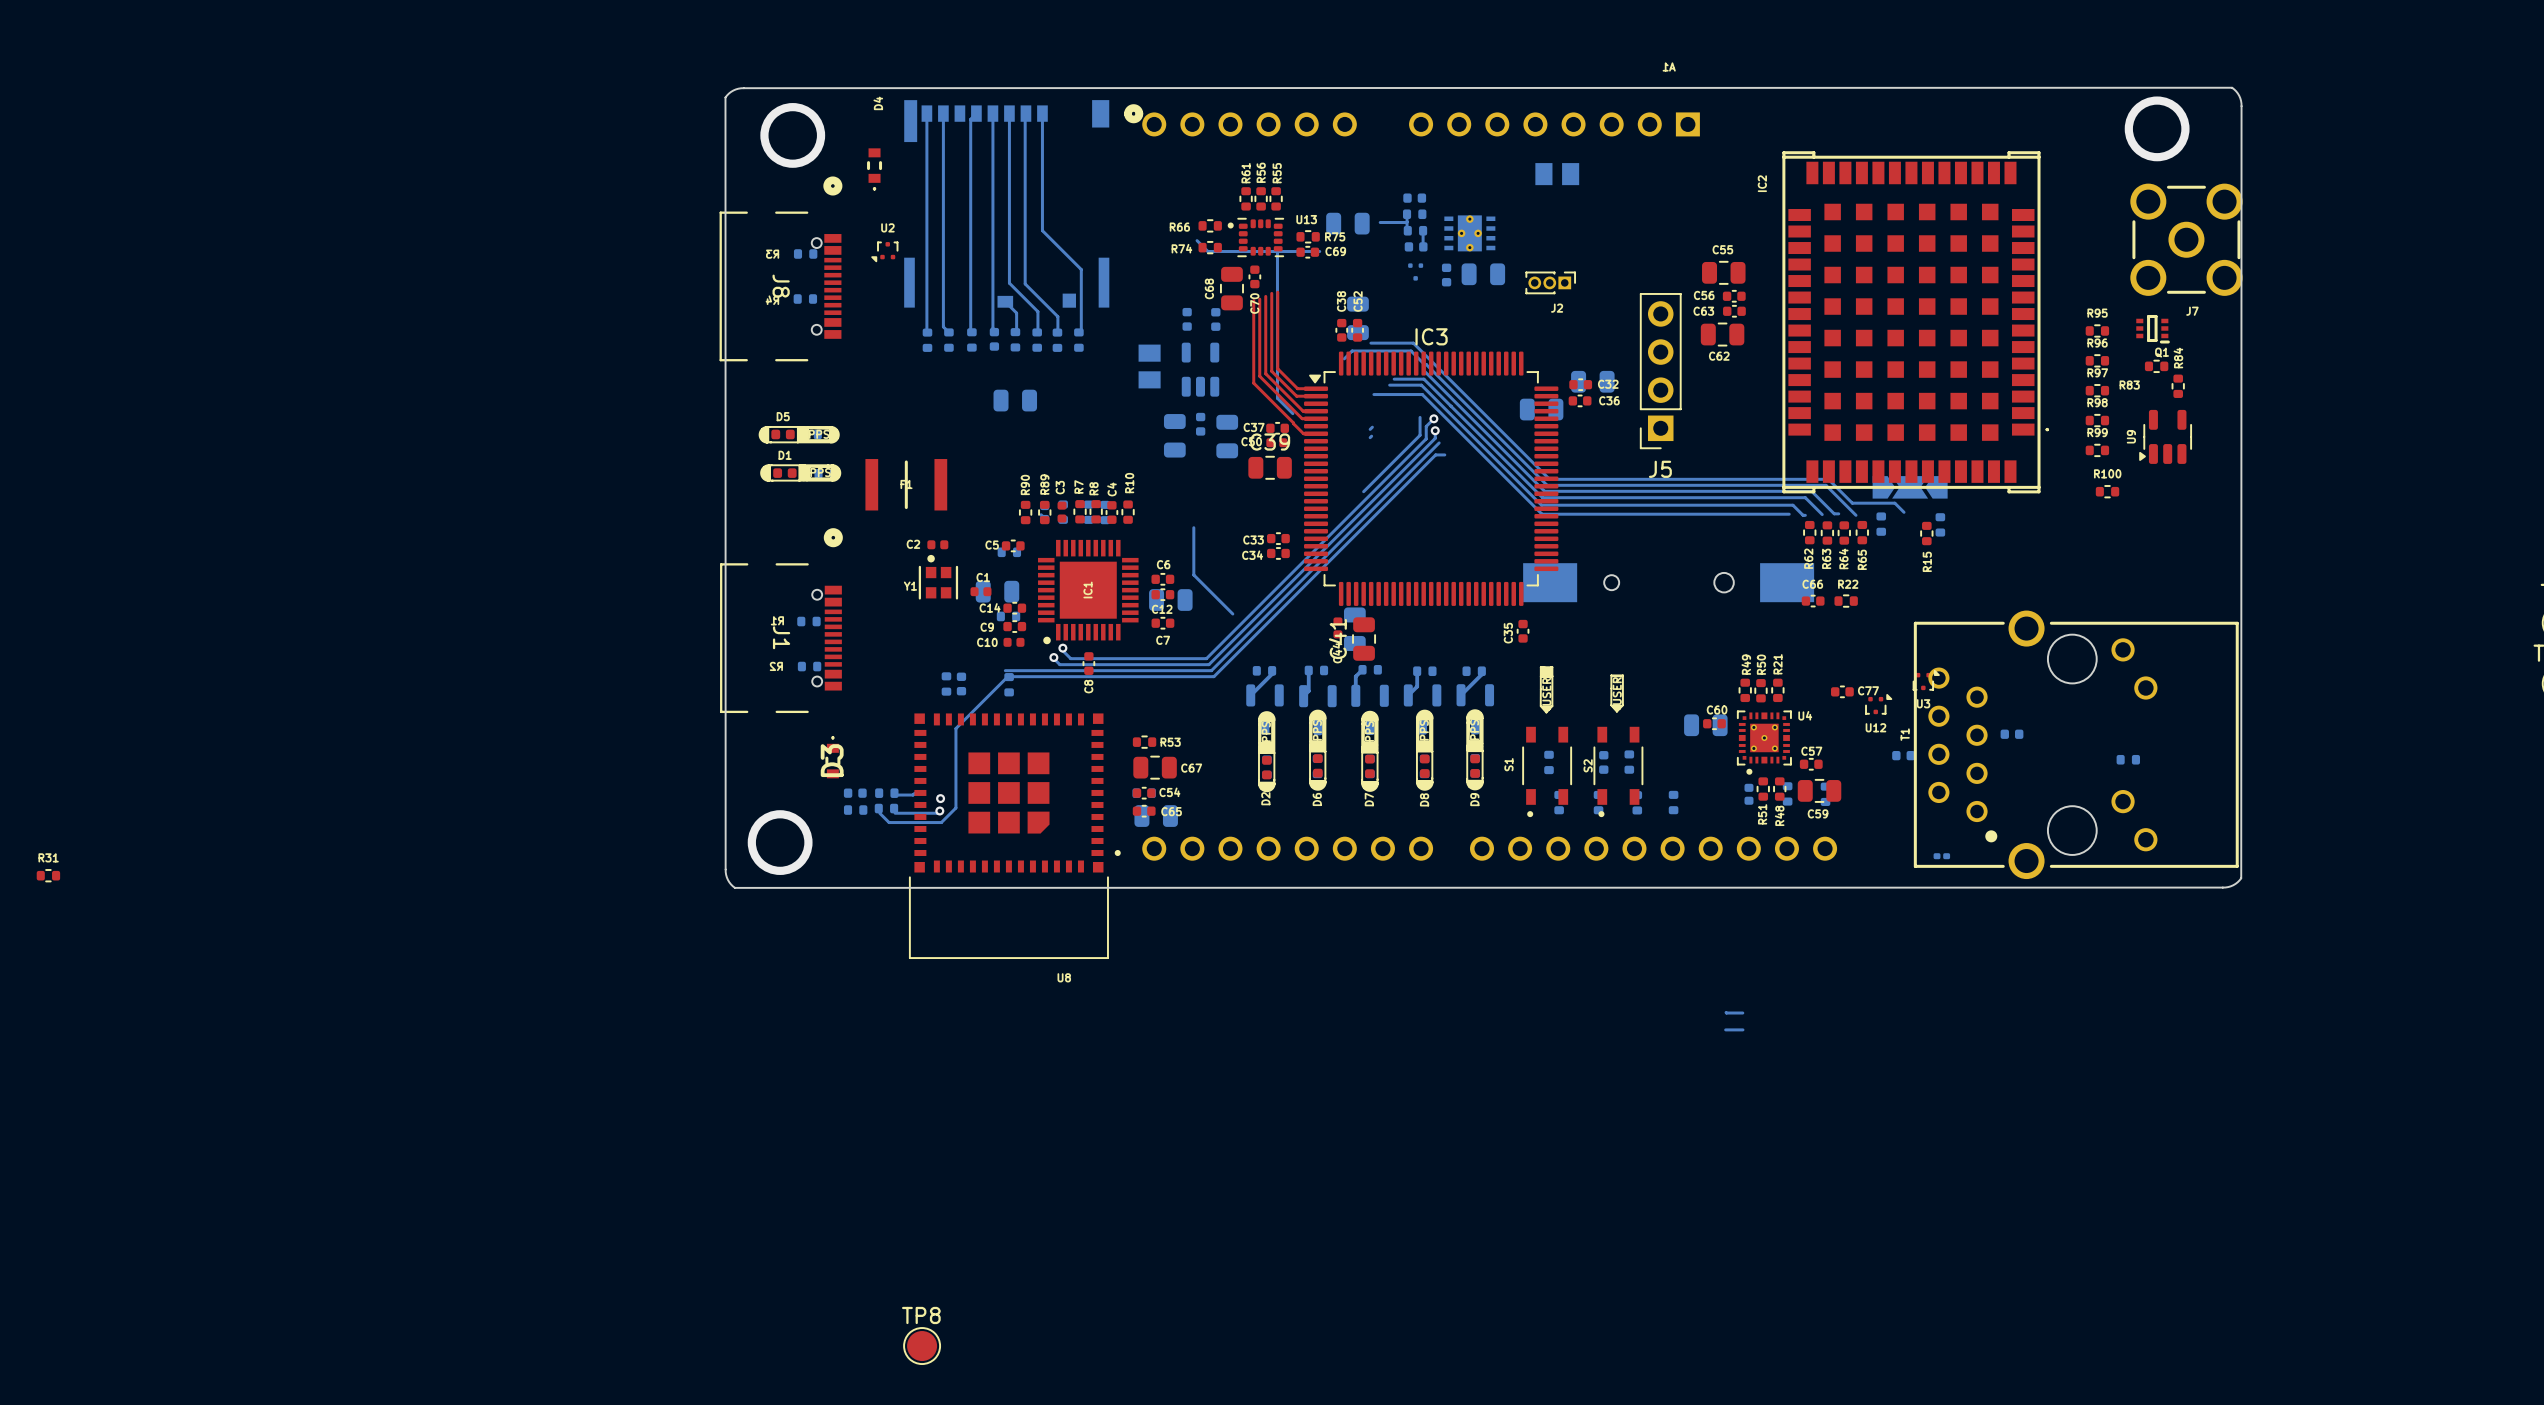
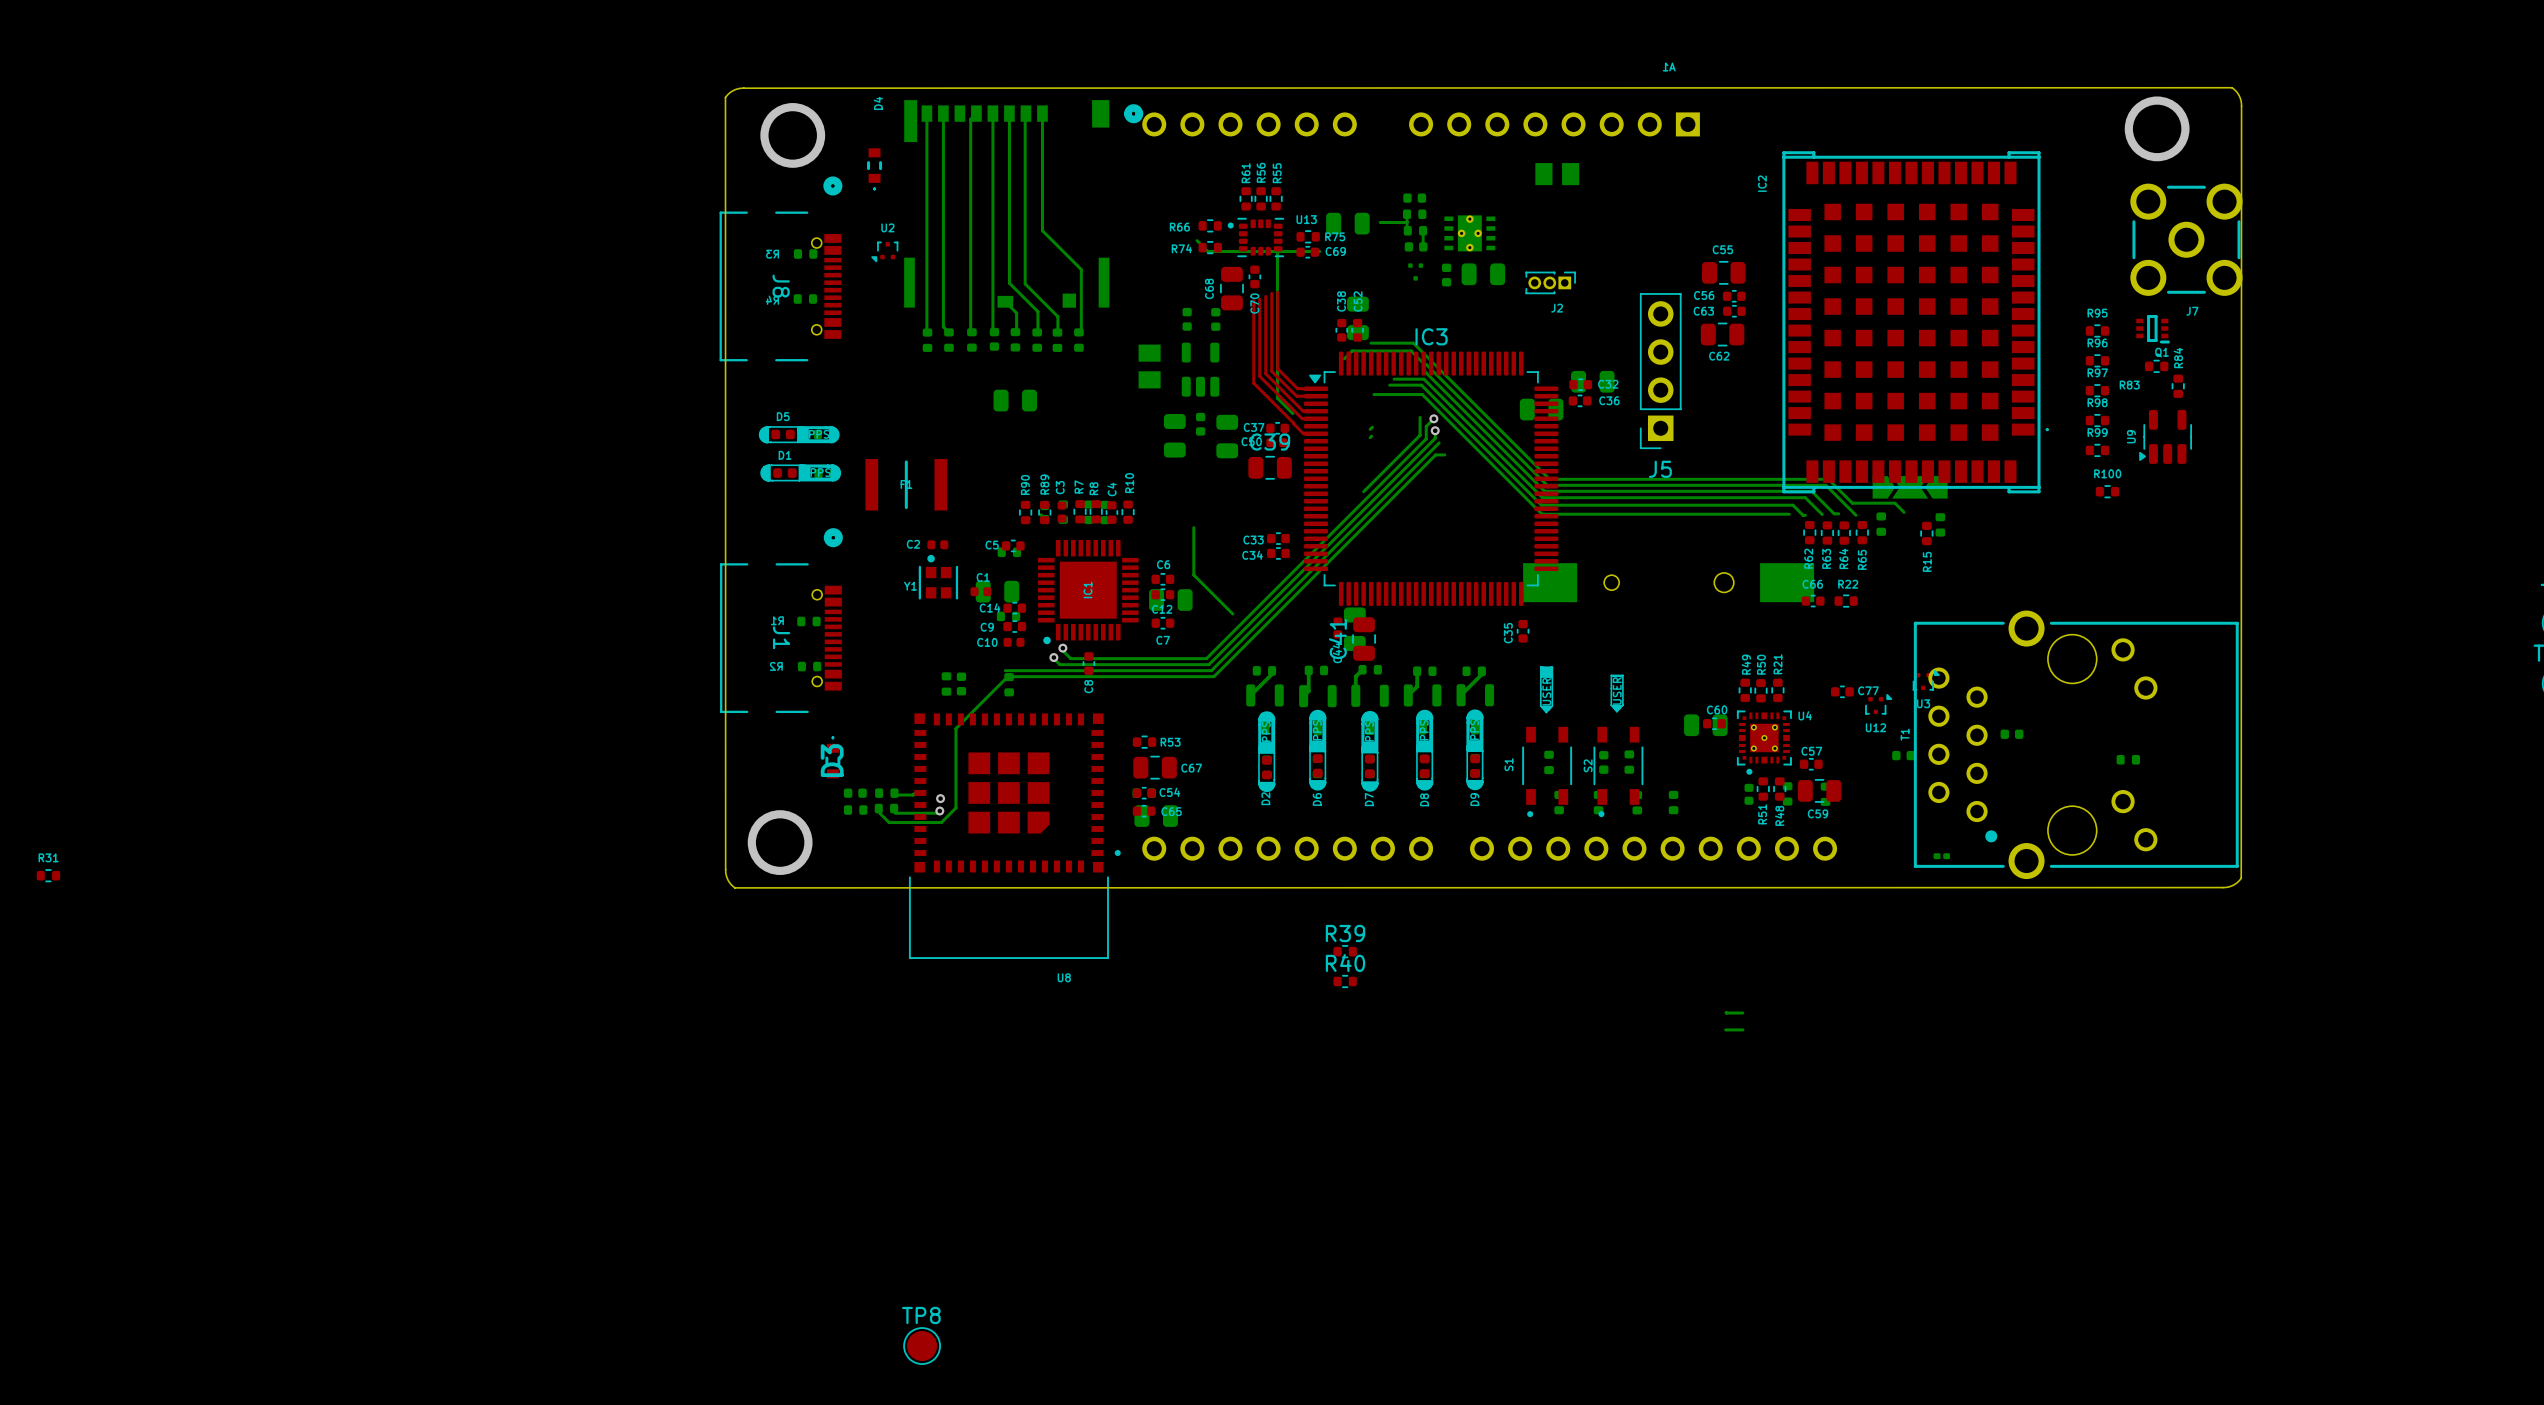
R39: none -> (1345, 951)
R40: none -> (1345, 981)

